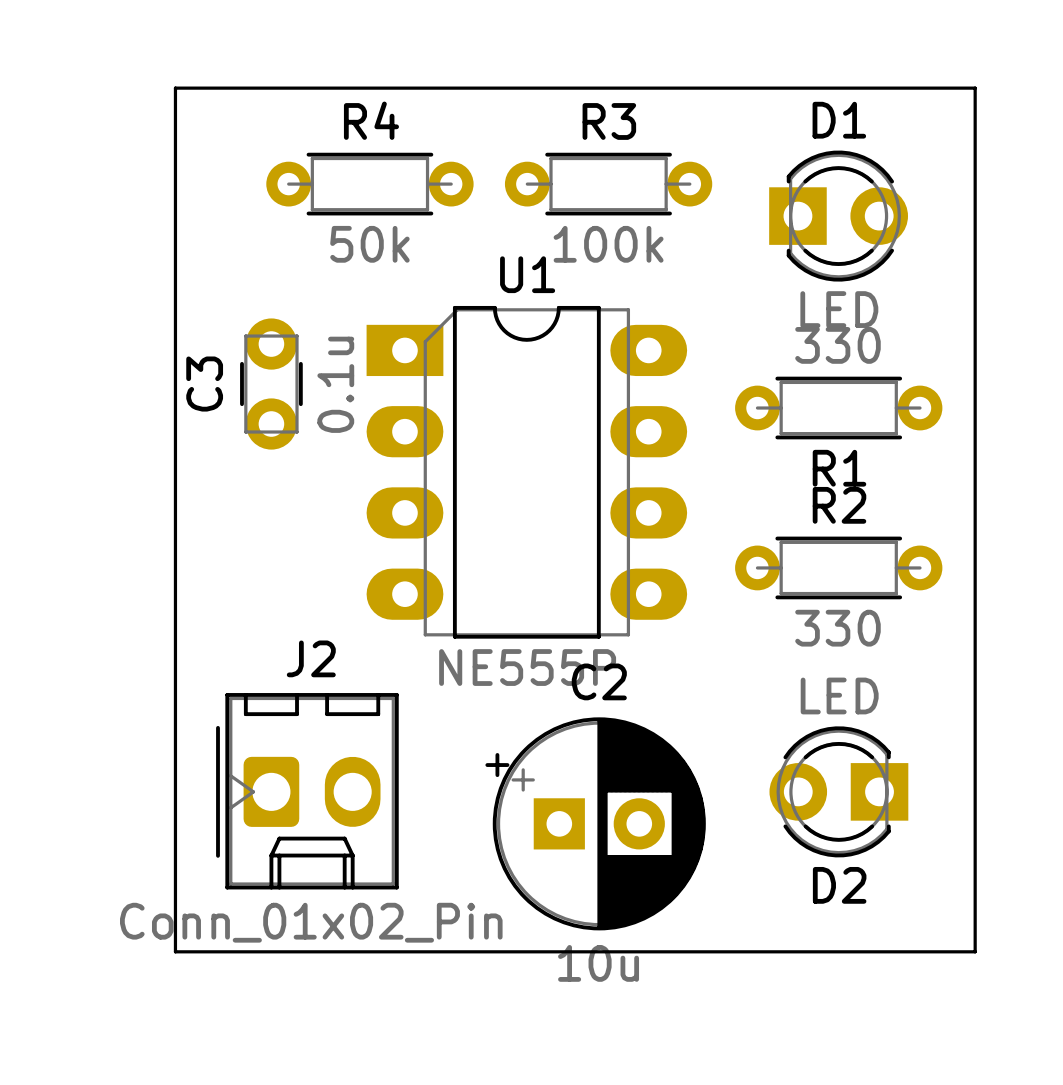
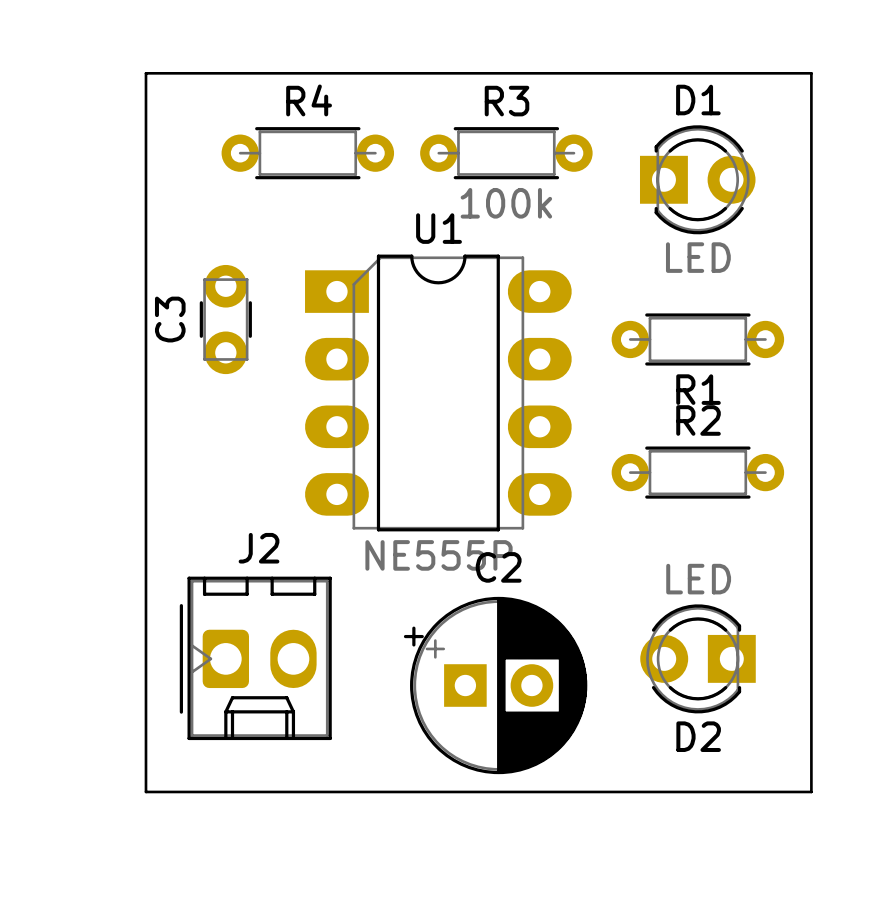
R4 value: 50k (369, 244) -> none
R1 value: 330 (837, 345) -> none
C3 value: 0.1u (335, 384) -> none
R2 value: 330 (837, 628) -> none
J2 value: Conn_01x02_Pin (311, 922) -> none
C2 value: 10u (598, 963) -> none

